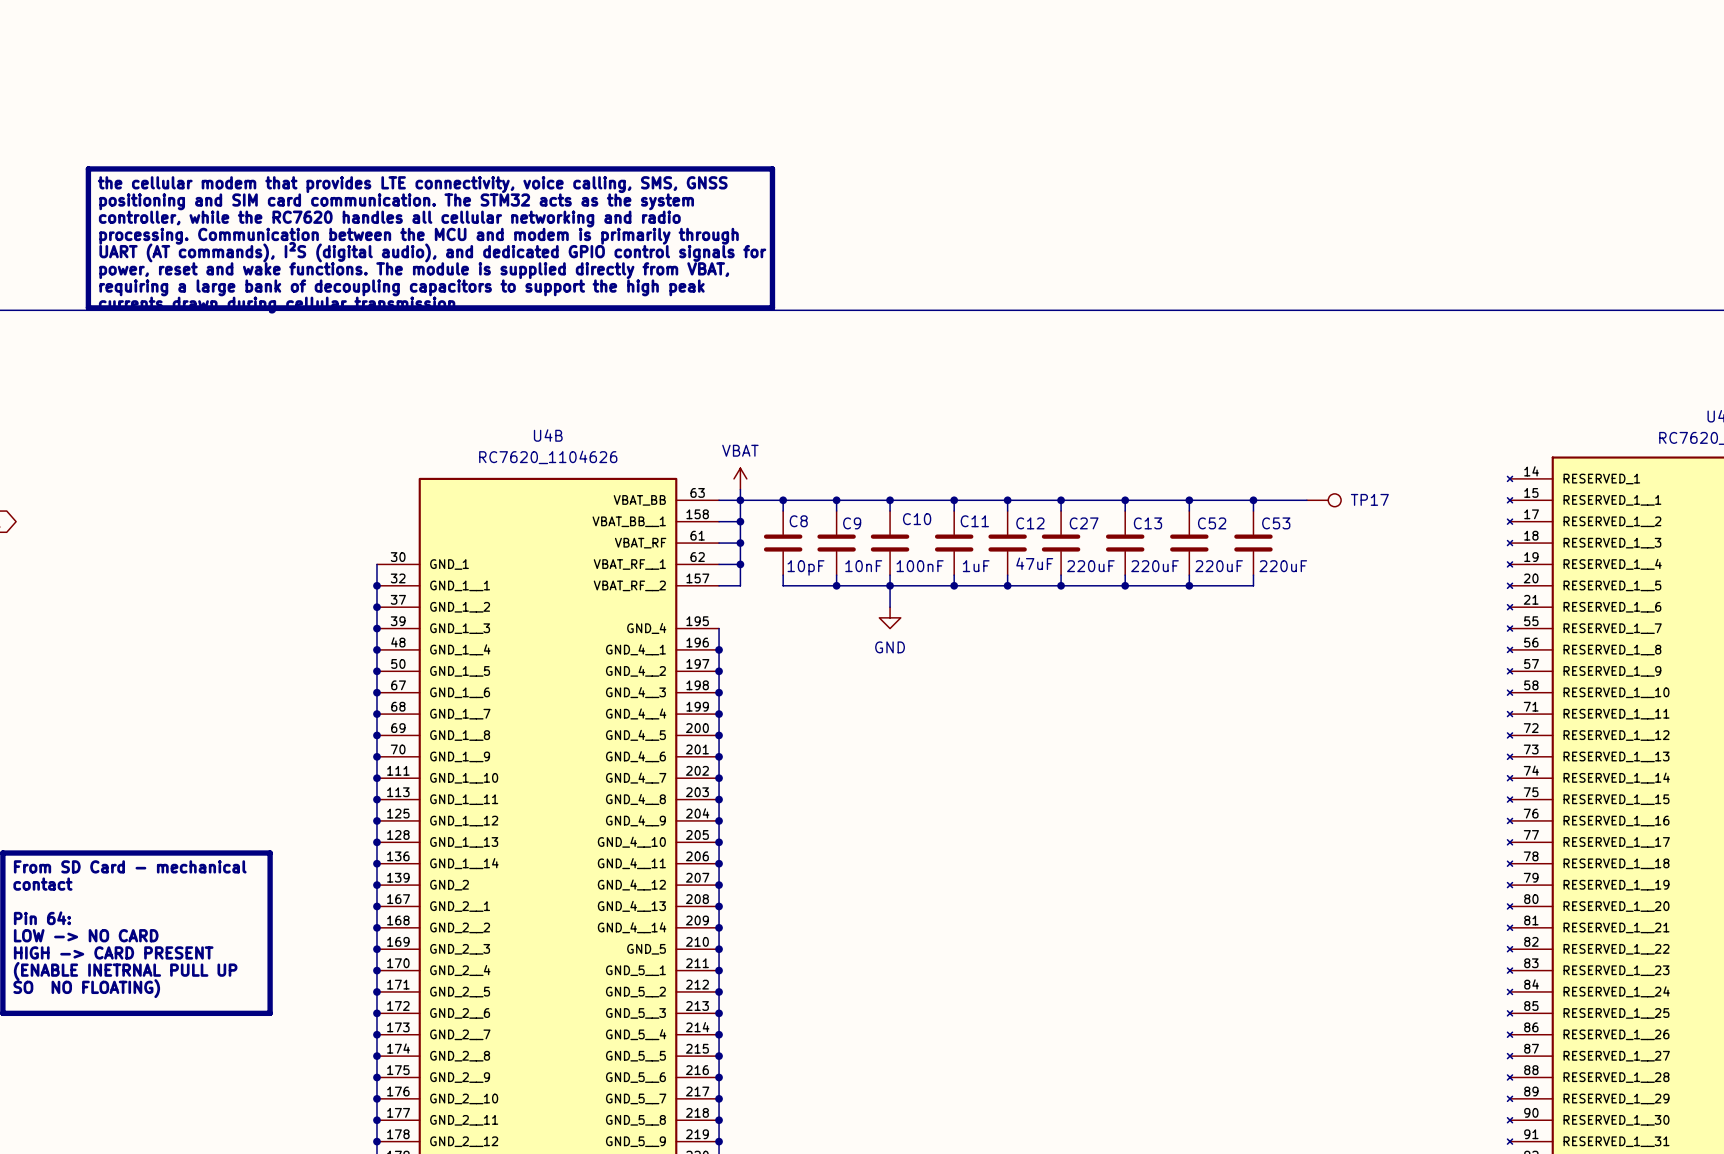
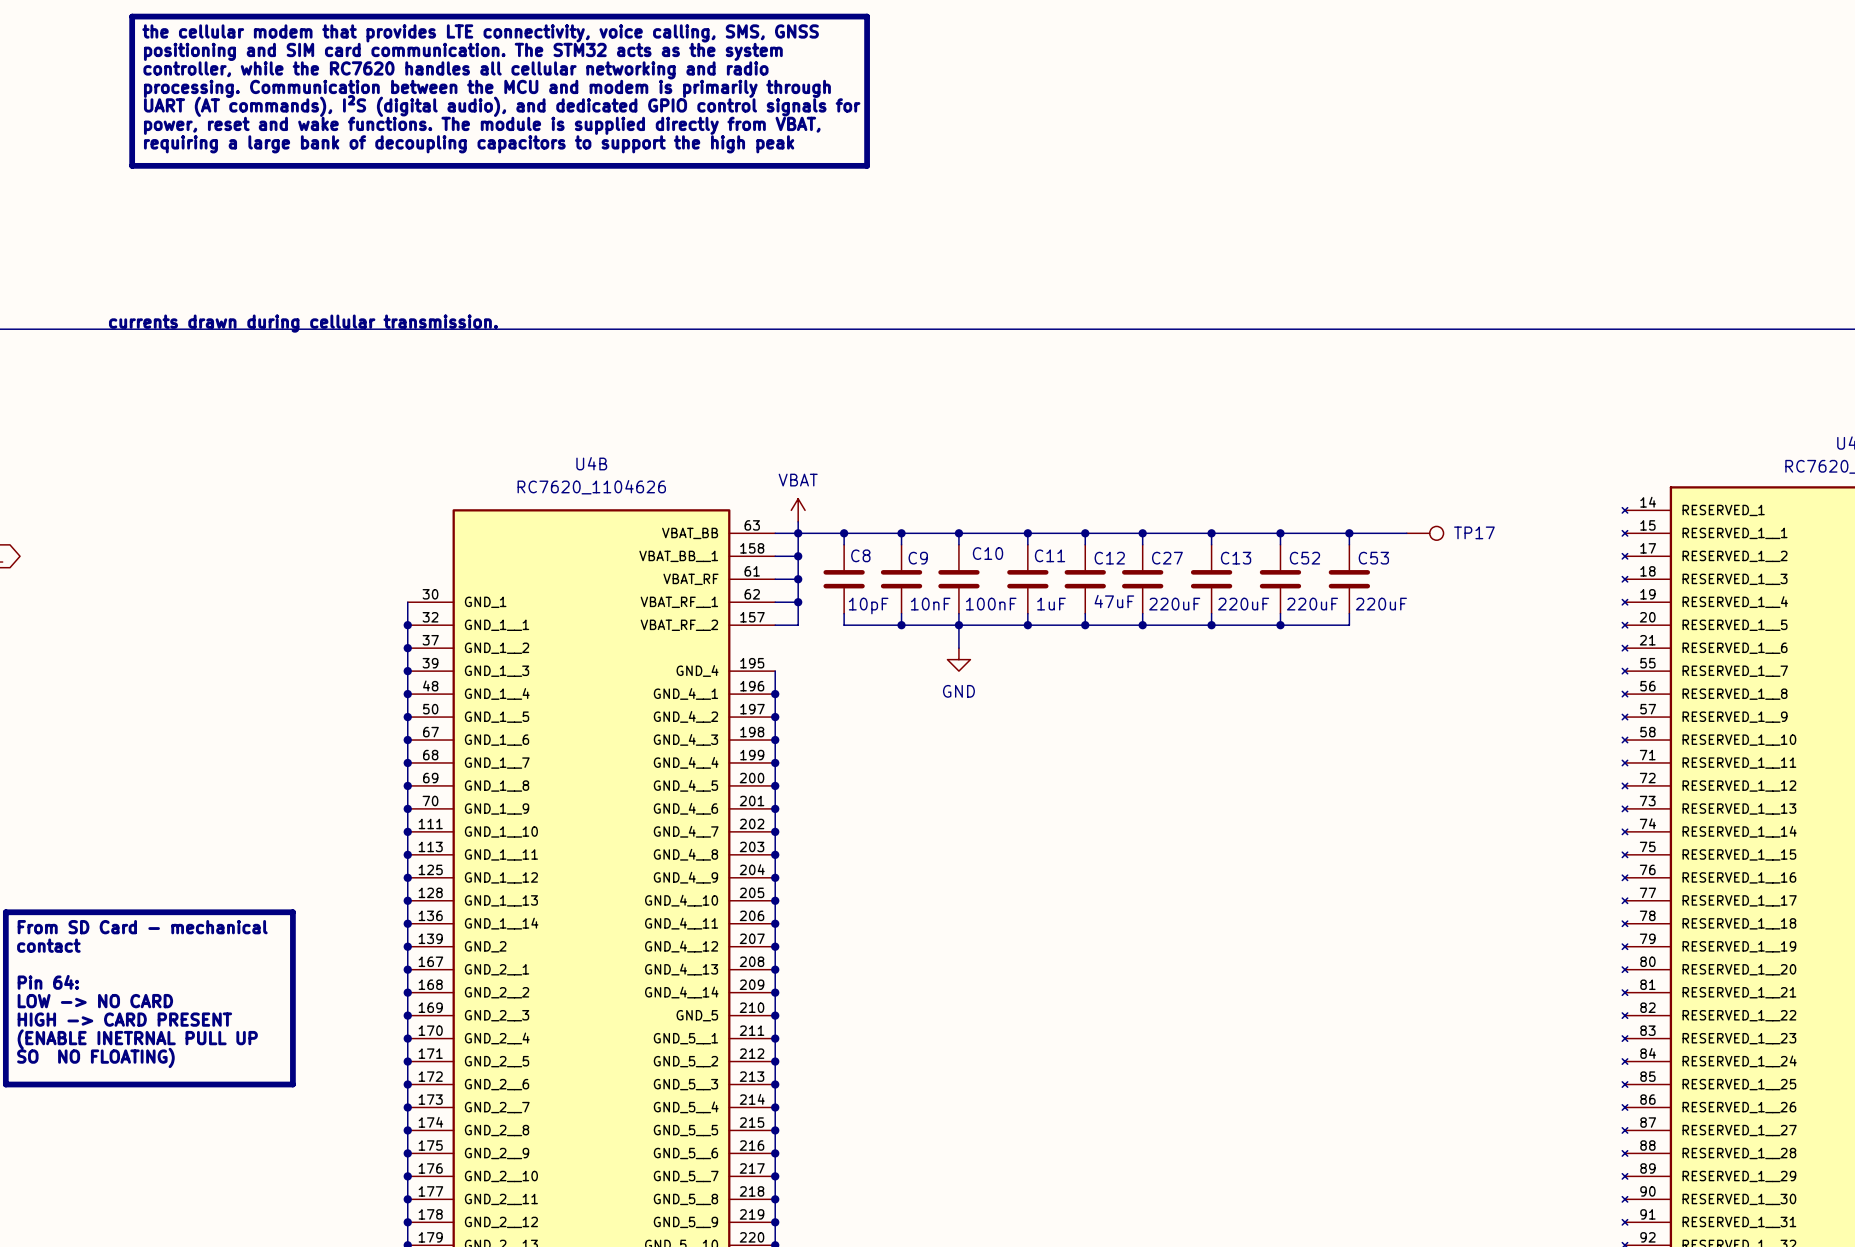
line: (88, 168) (772, 168) (772, 307) (88, 307) (88, 168) -> (132, 16) (867, 16) (867, 165) (132, 165) (132, 16)
text position: the cellular modem that provides LTE connectivity, voice calling, SMS, GNSS (412, 184) -> the cellular modem that provides LTE connectivity, voice calling, SMS, GNSS (480, 33)
text position: positioning and SIM card communication. The STM32 acts as the system (396, 201) -> positioning and SIM card communication. The STM32 acts as the system (463, 51)
text position: controller, while the RC7620 handles all cellular networking and radio (389, 219) -> controller, while the RC7620 handles all cellular networking and radio (455, 70)
text position: processing. Communication between the MCU and modem is primarily through (419, 236) -> processing. Communication between the MCU and modem is primarily through (487, 88)
text position: UART (AT commands), I²S (digital audio), and dedicated GPIO control signals for (432, 252) -> UART (AT commands), I²S (digital audio), and dedicated GPIO control signals for (502, 105)
text position: power, reset and wake functions. The module is supplied directly from VBAT, (414, 270) -> power, reset and wake functions. The module is supplied directly from VBAT, (482, 125)
text position: requiring a large bank of decoupling capacitors to support the high peak (402, 287) -> requiring a large bank of decoupling capacitors to support the high peak (469, 144)

